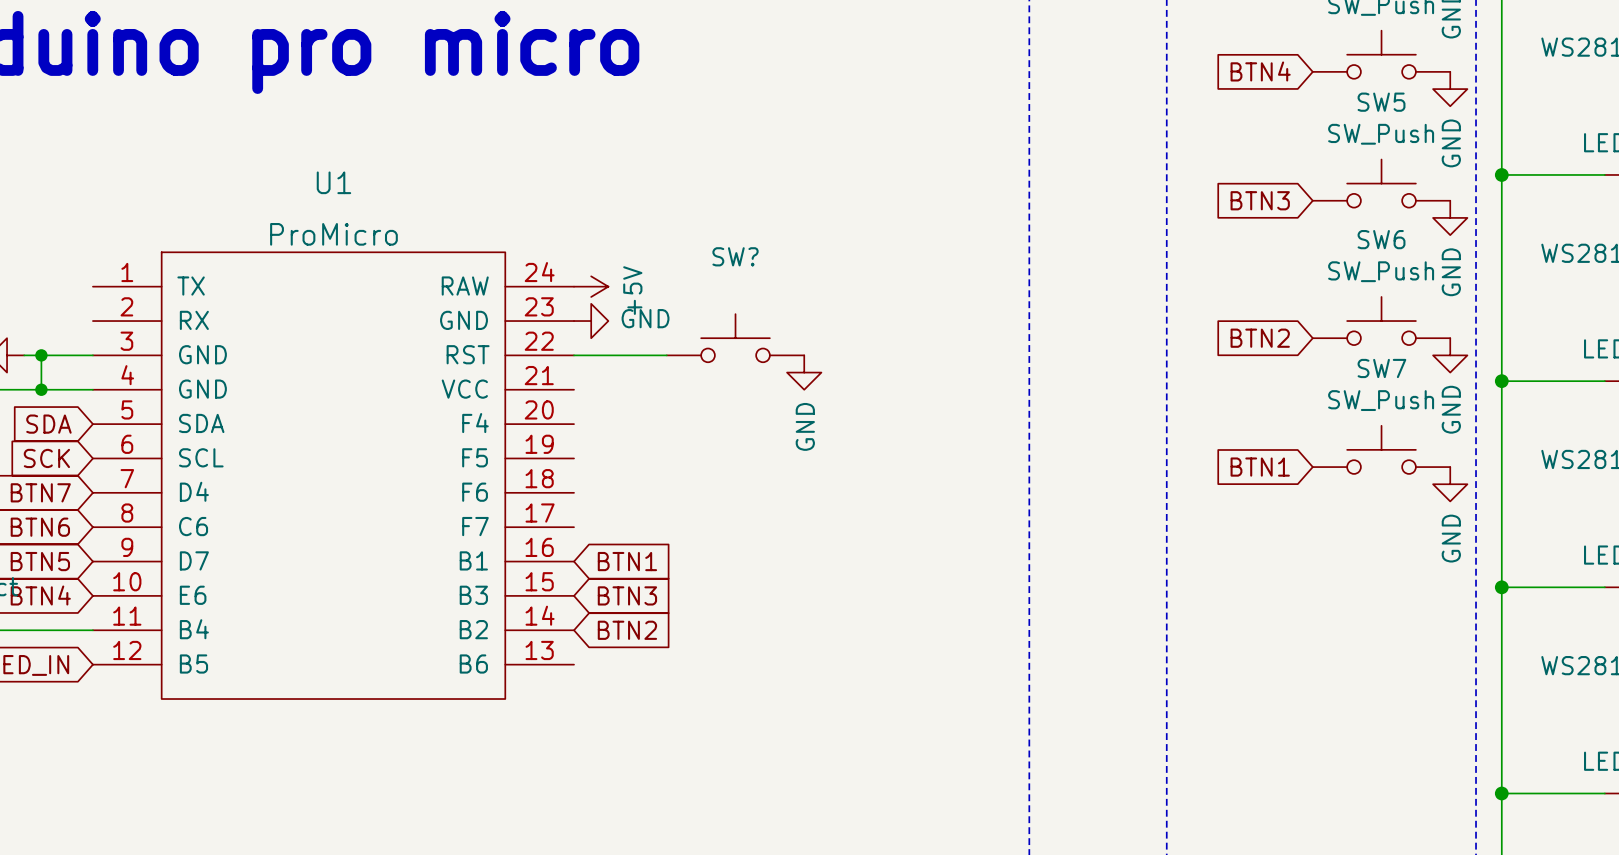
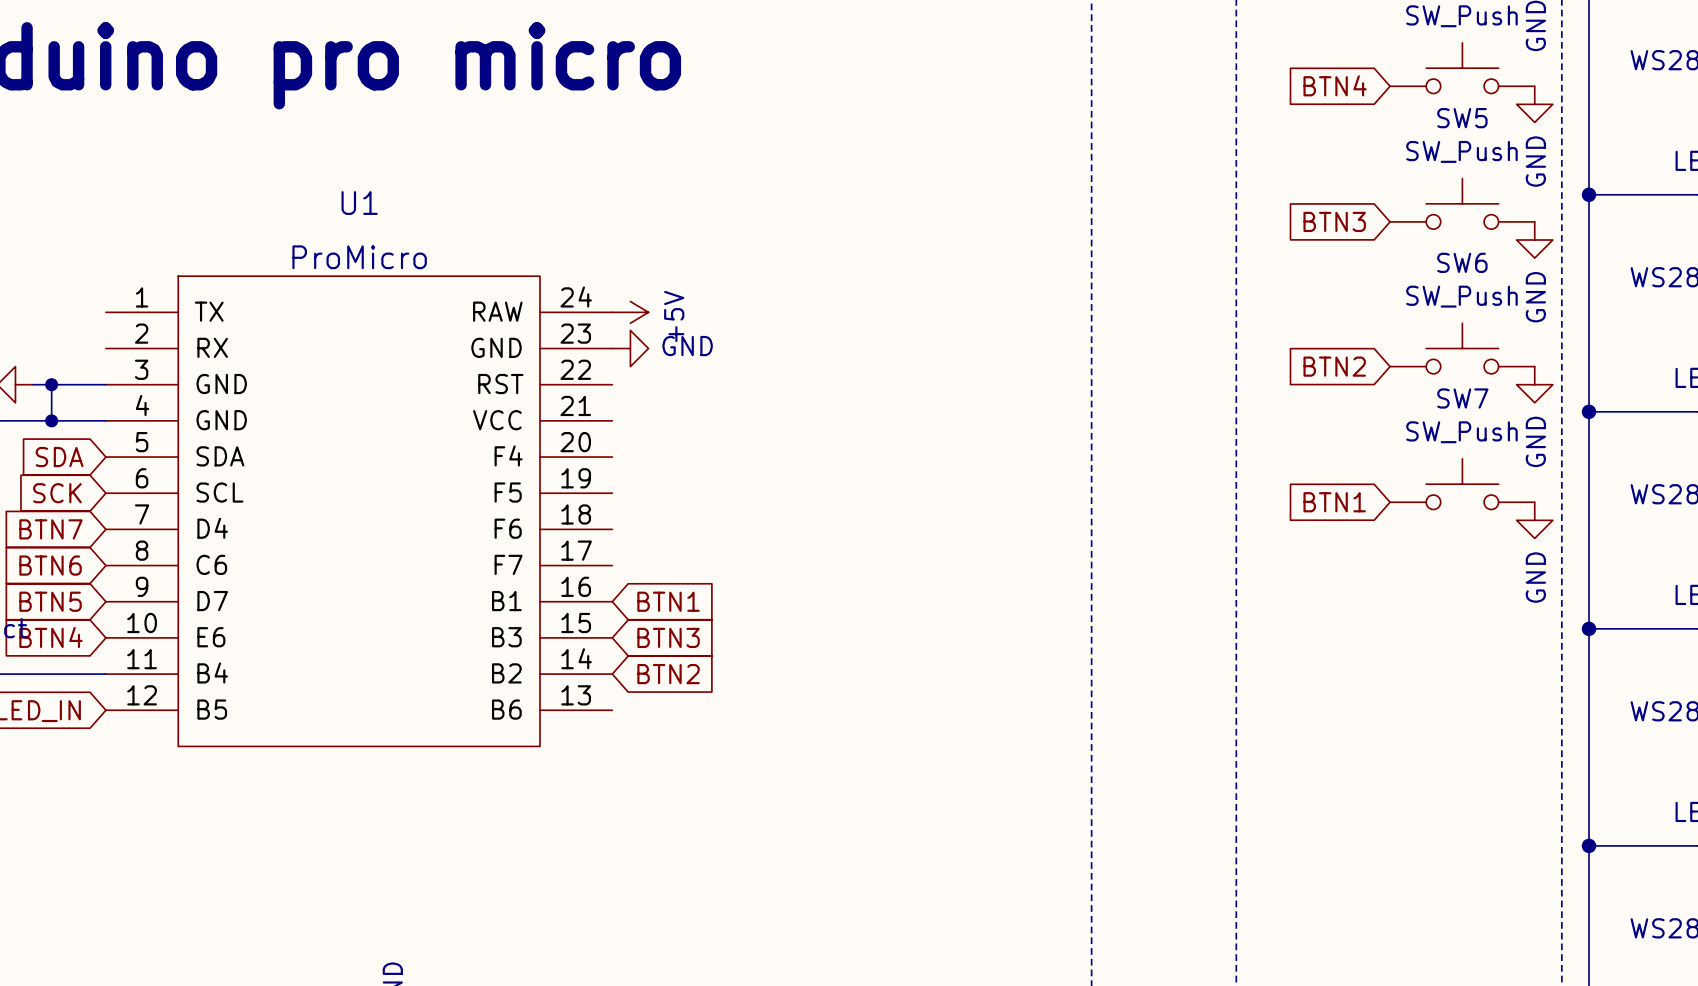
SW?: (735, 338) -> none
wire: (574, 355) (666, 355) -> none
power symbol: GND (804, 372) -> none

